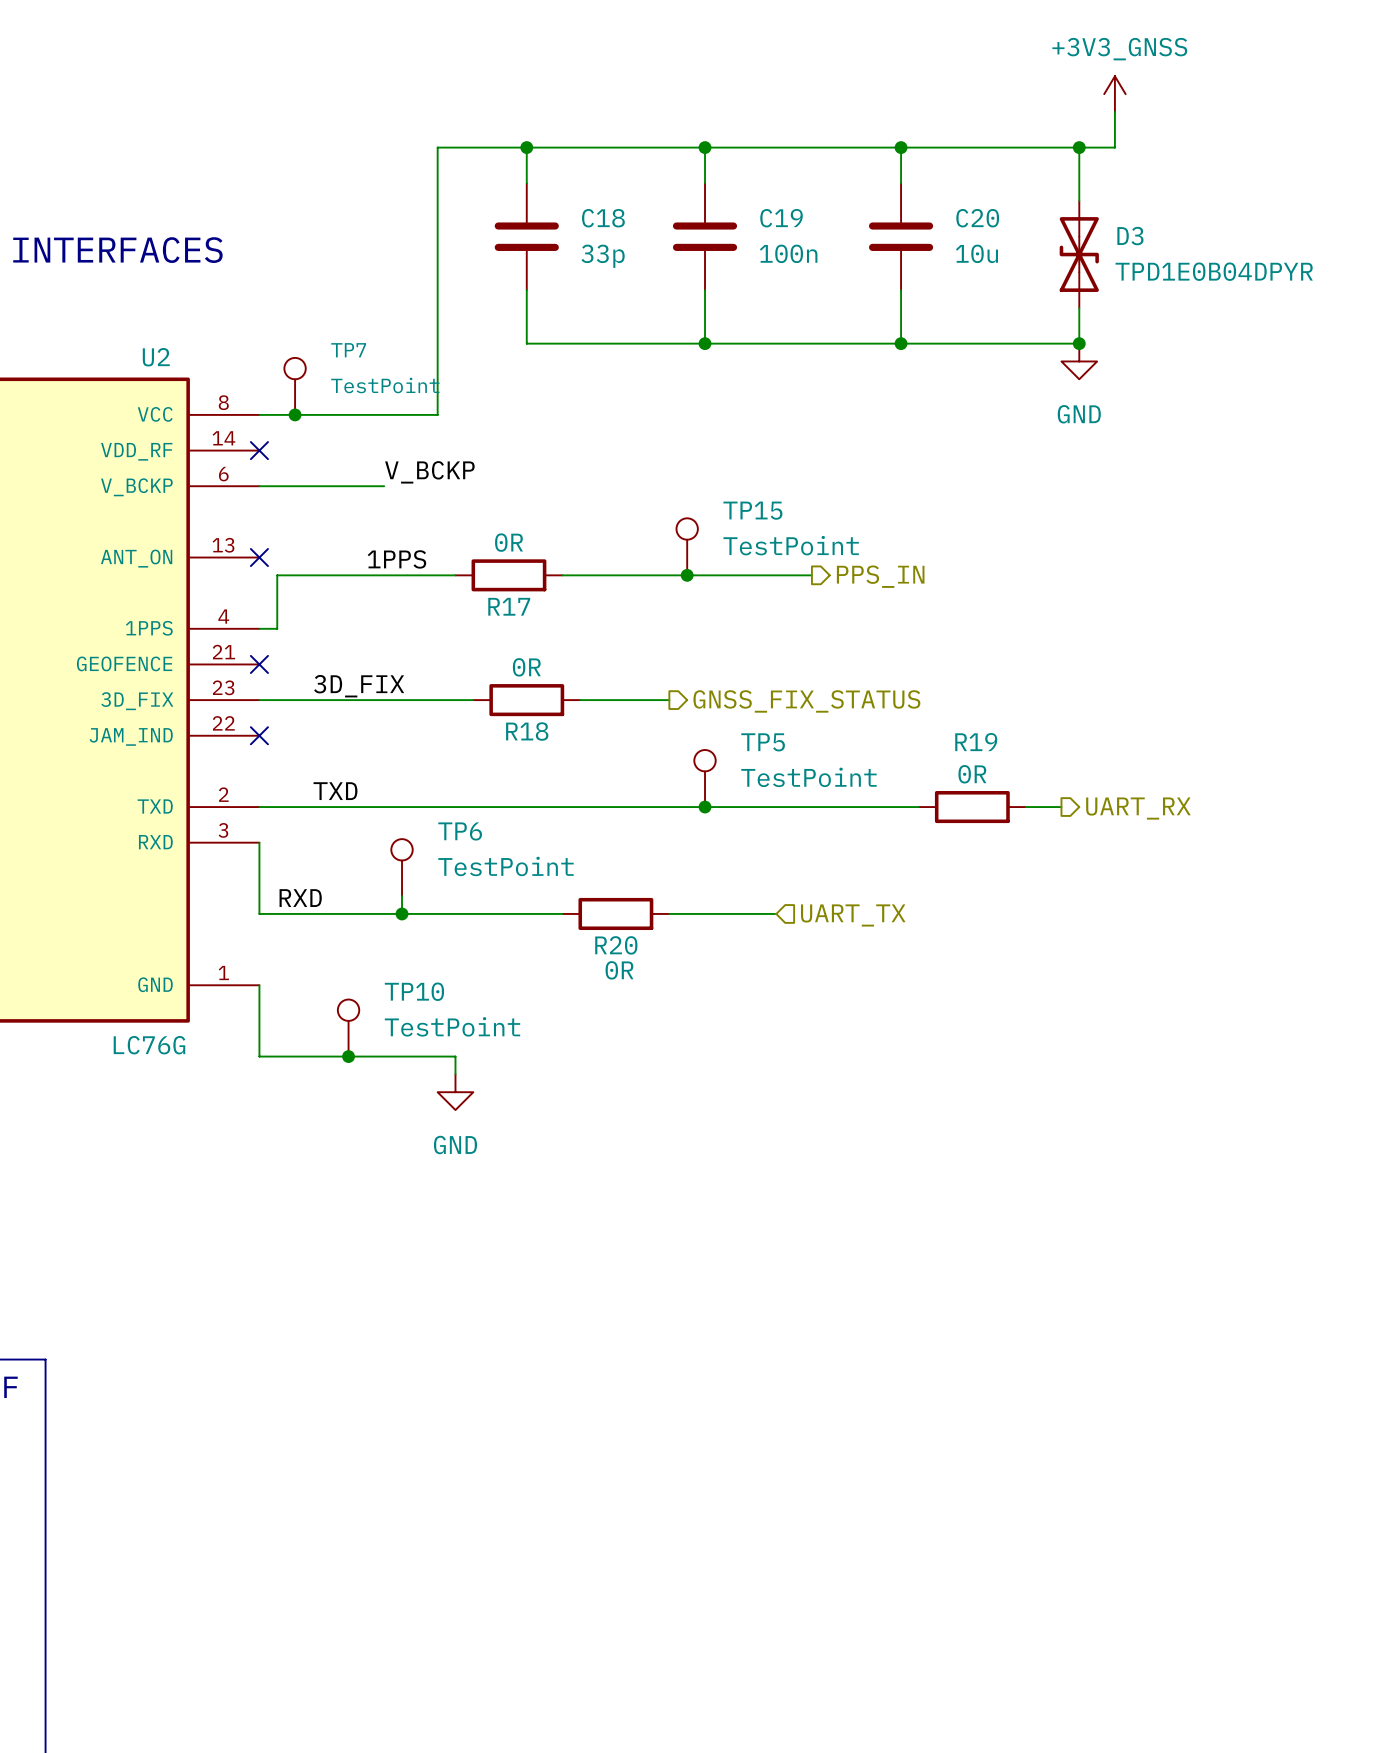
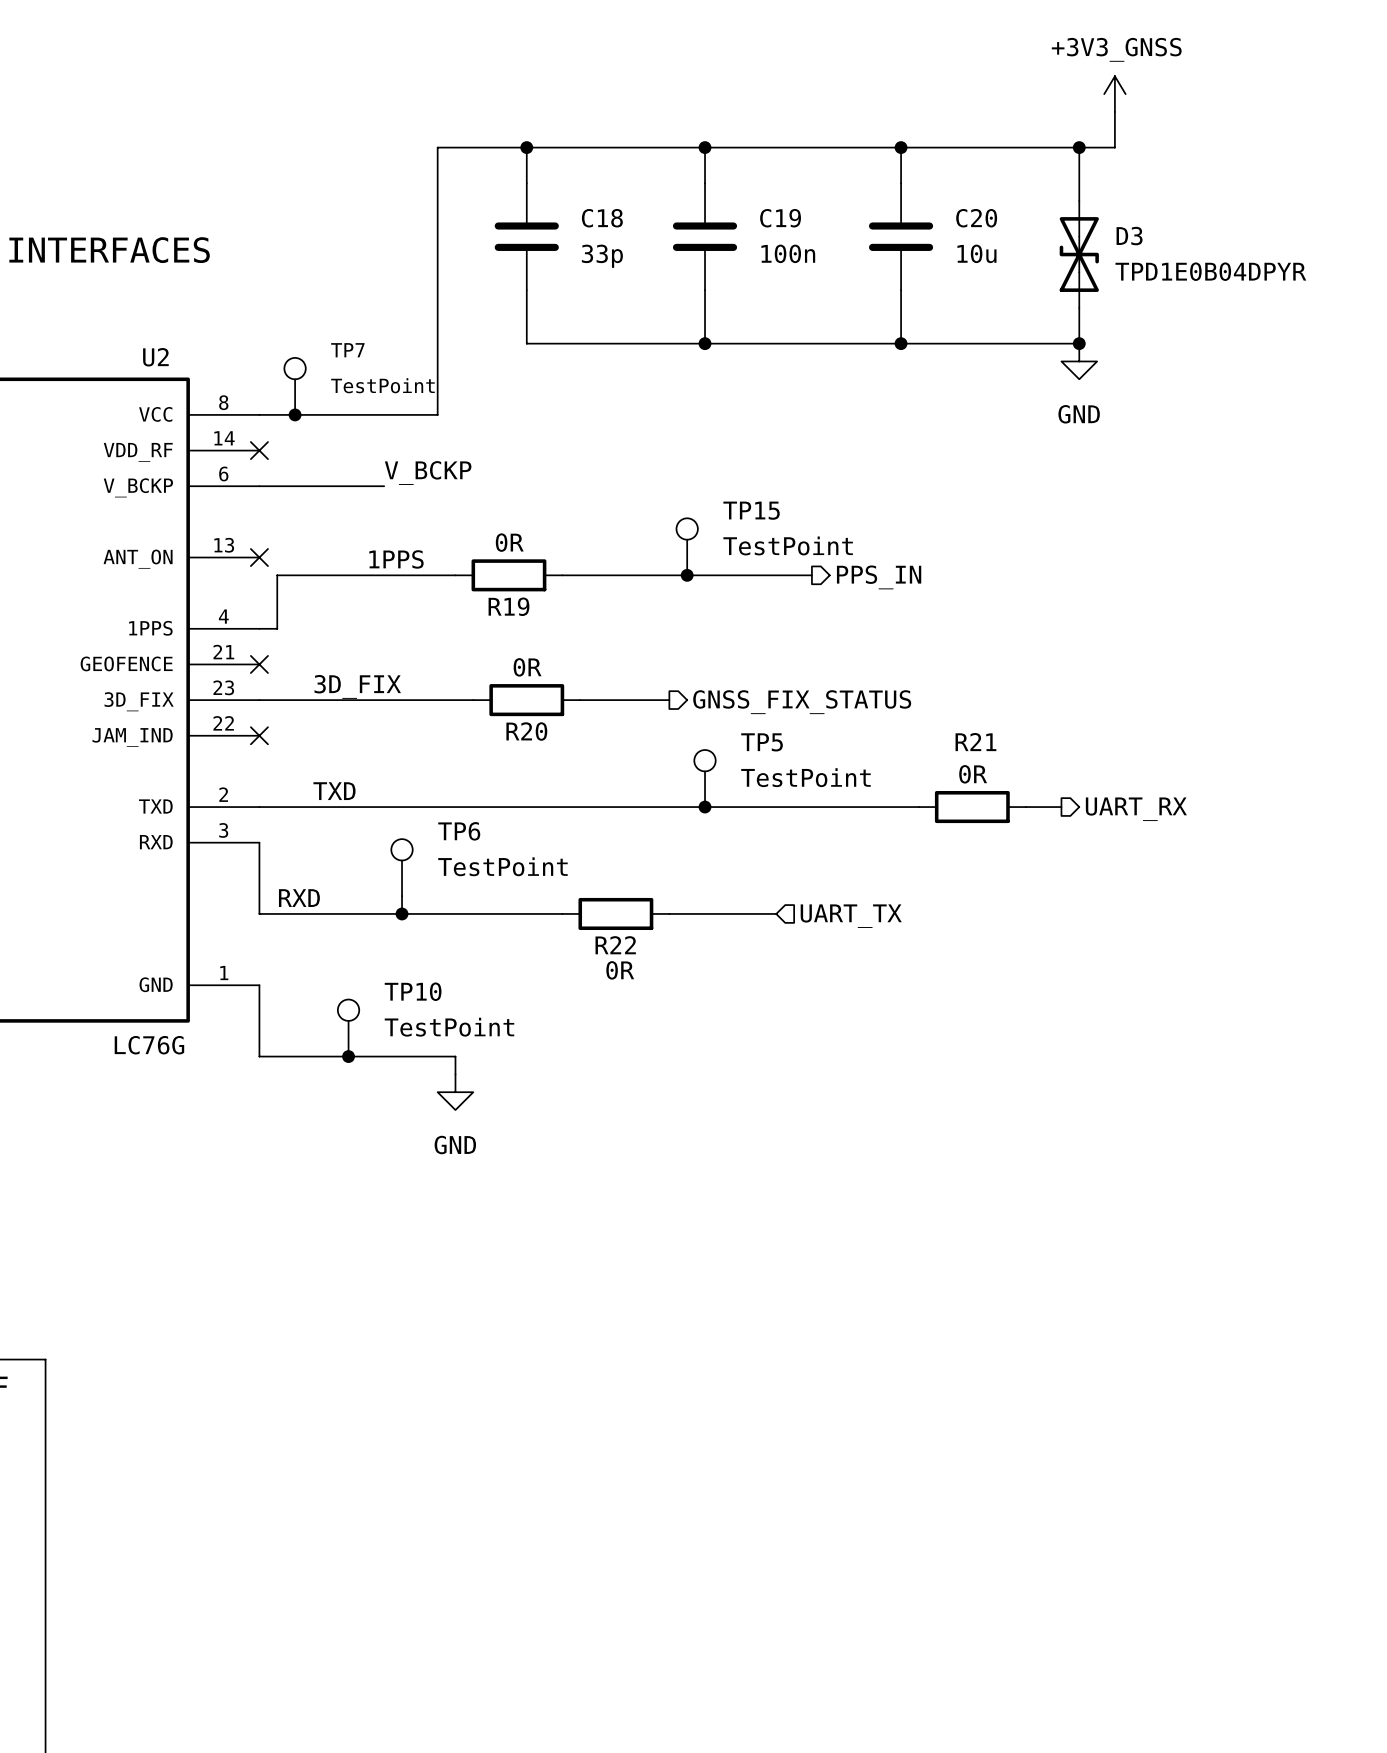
R17 name: R17 (509, 606) -> R19 (508, 606)
R18 name: R18 (527, 731) -> R20 (526, 731)
R19 name: R19 (976, 742) -> R21 (975, 742)
R20 name: R20 (616, 945) -> R22 (615, 945)

